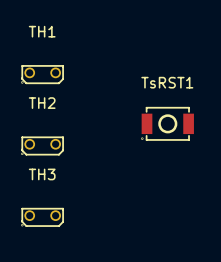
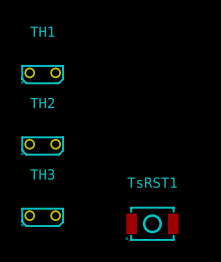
TsRST1 position: (167, 123) -> (152, 223)

